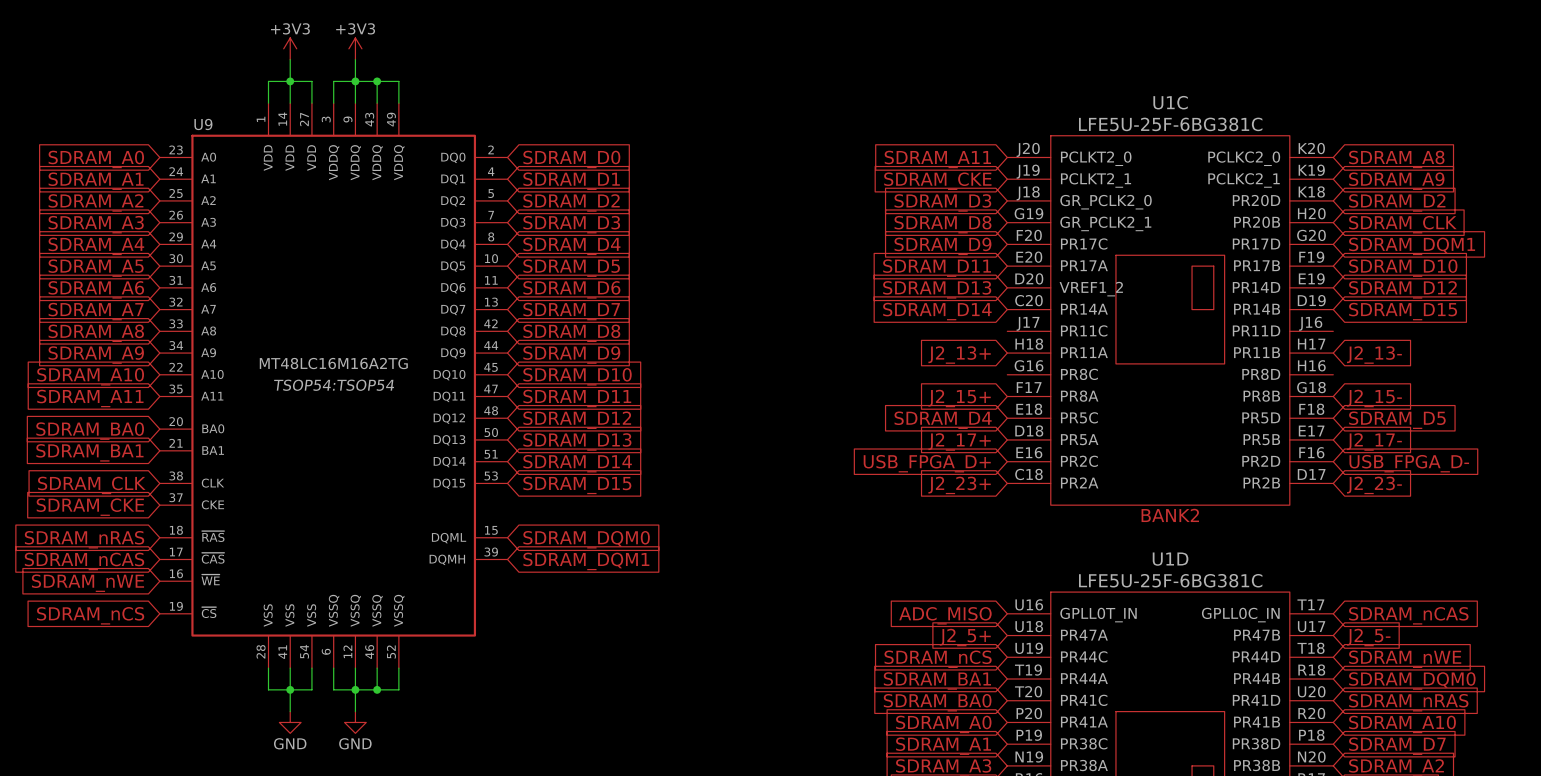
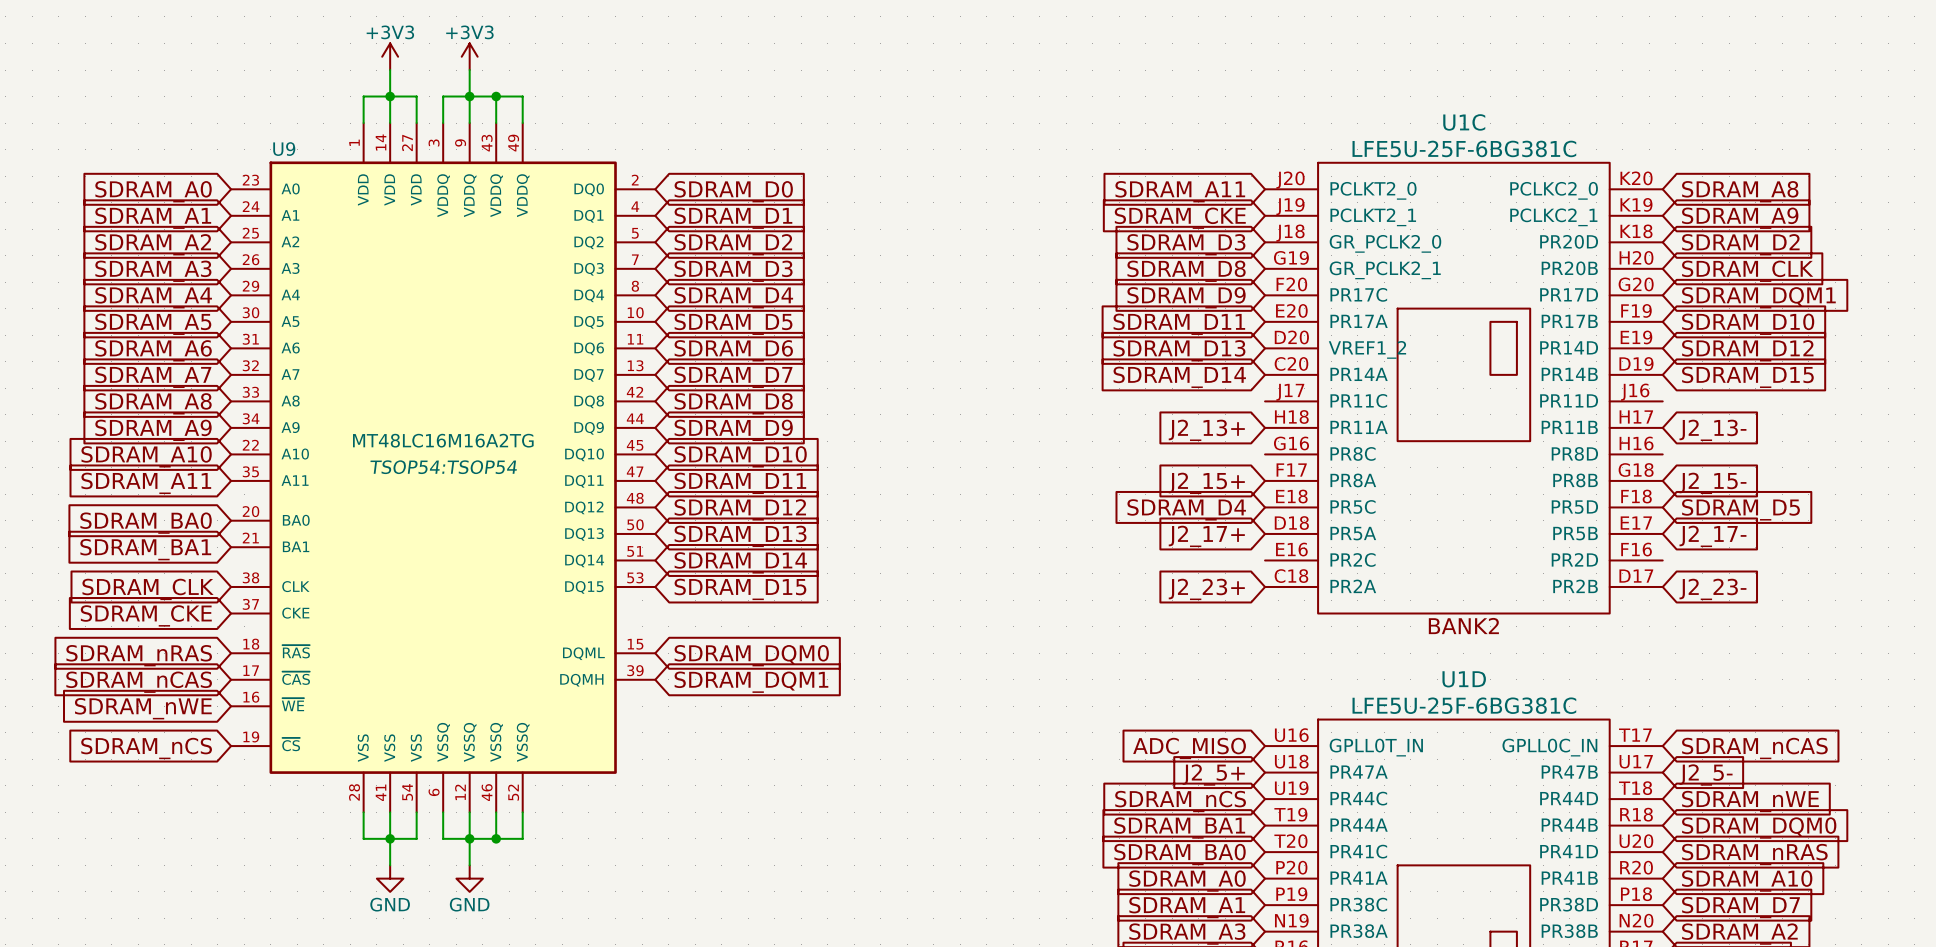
global label: USB_FPGA_D+ (927, 463) -> none
global label: USB_FPGA_D- (1409, 463) -> none

